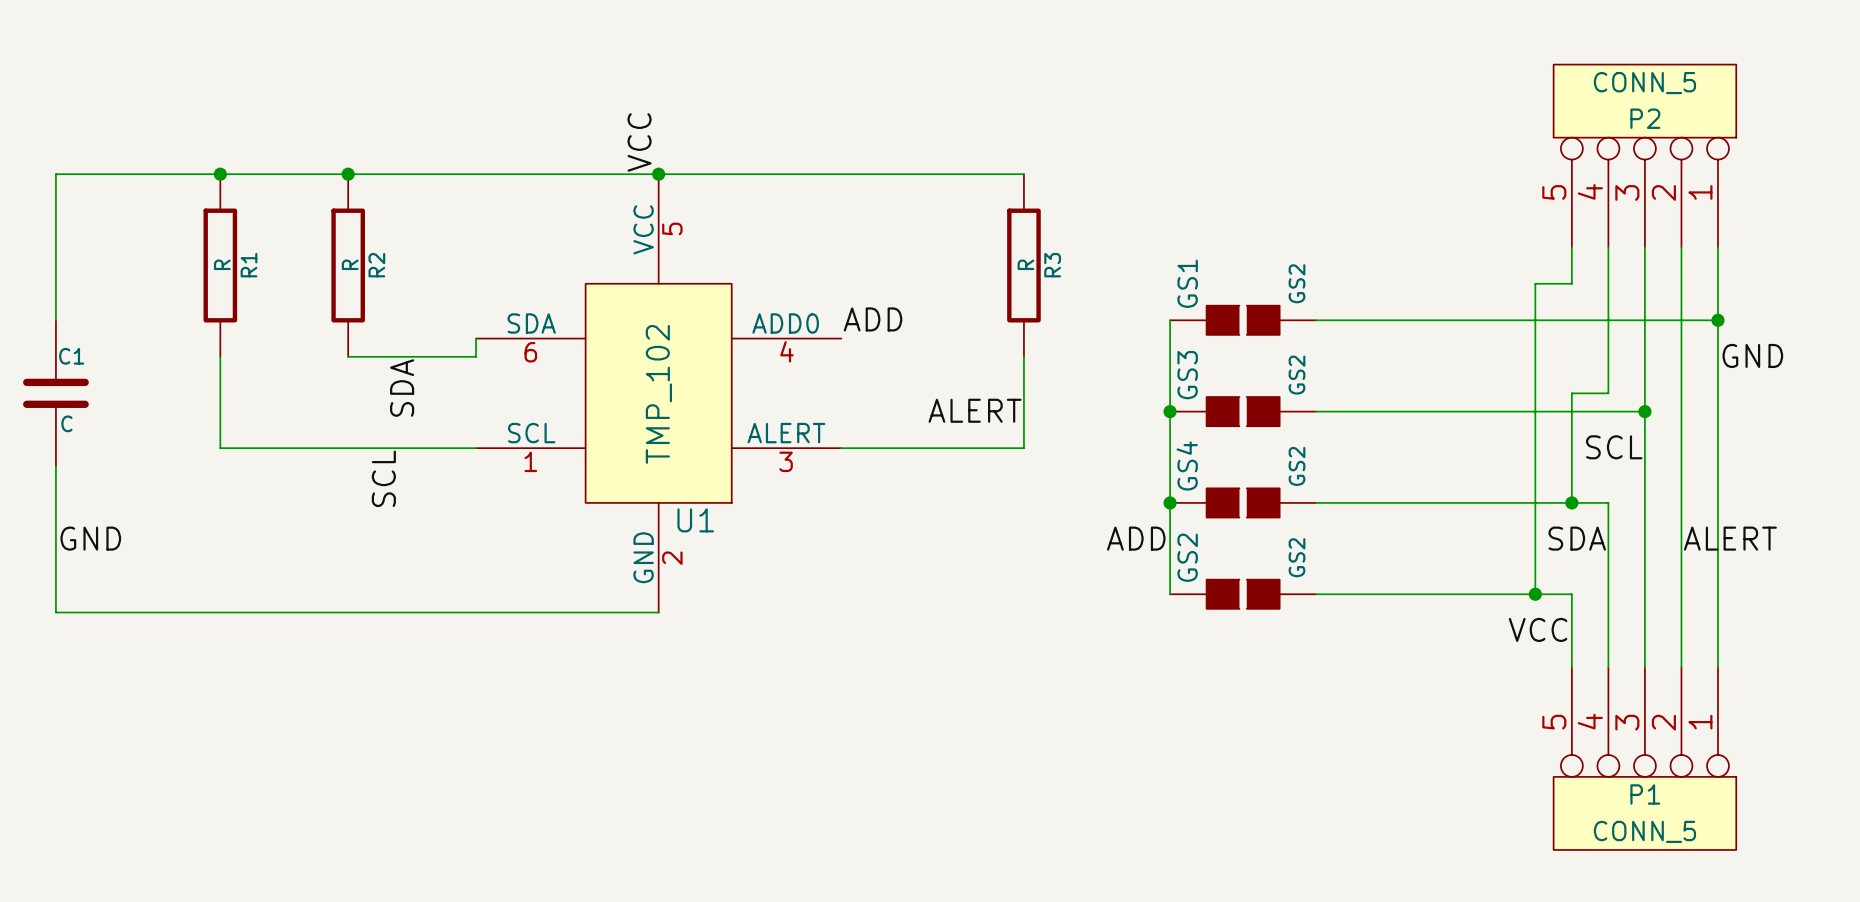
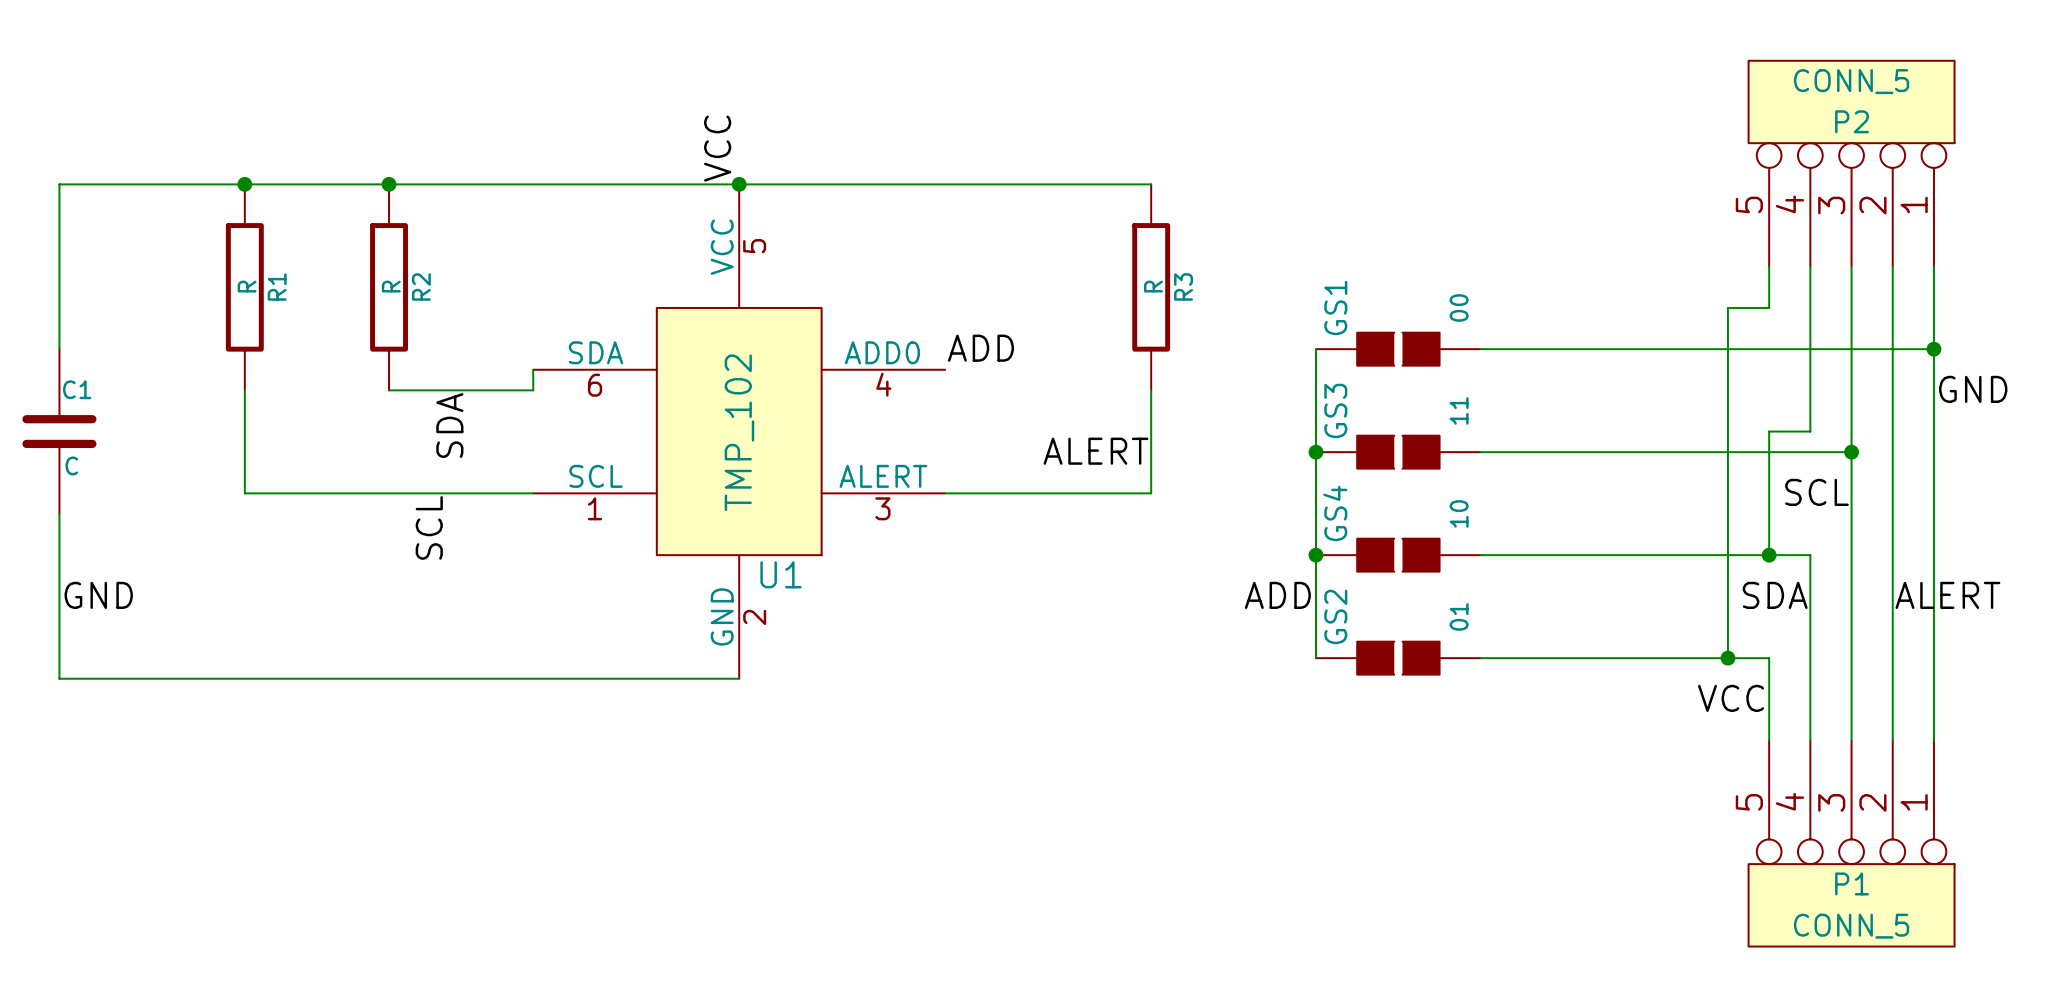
GS1 value: GS2 (1297, 283) -> 00 (1459, 307)
GS3 value: GS2 (1297, 375) -> 11 (1459, 410)
GS4 value: GS2 (1297, 466) -> 10 (1459, 513)
GS2 value: GS2 (1297, 557) -> 01 (1459, 616)

